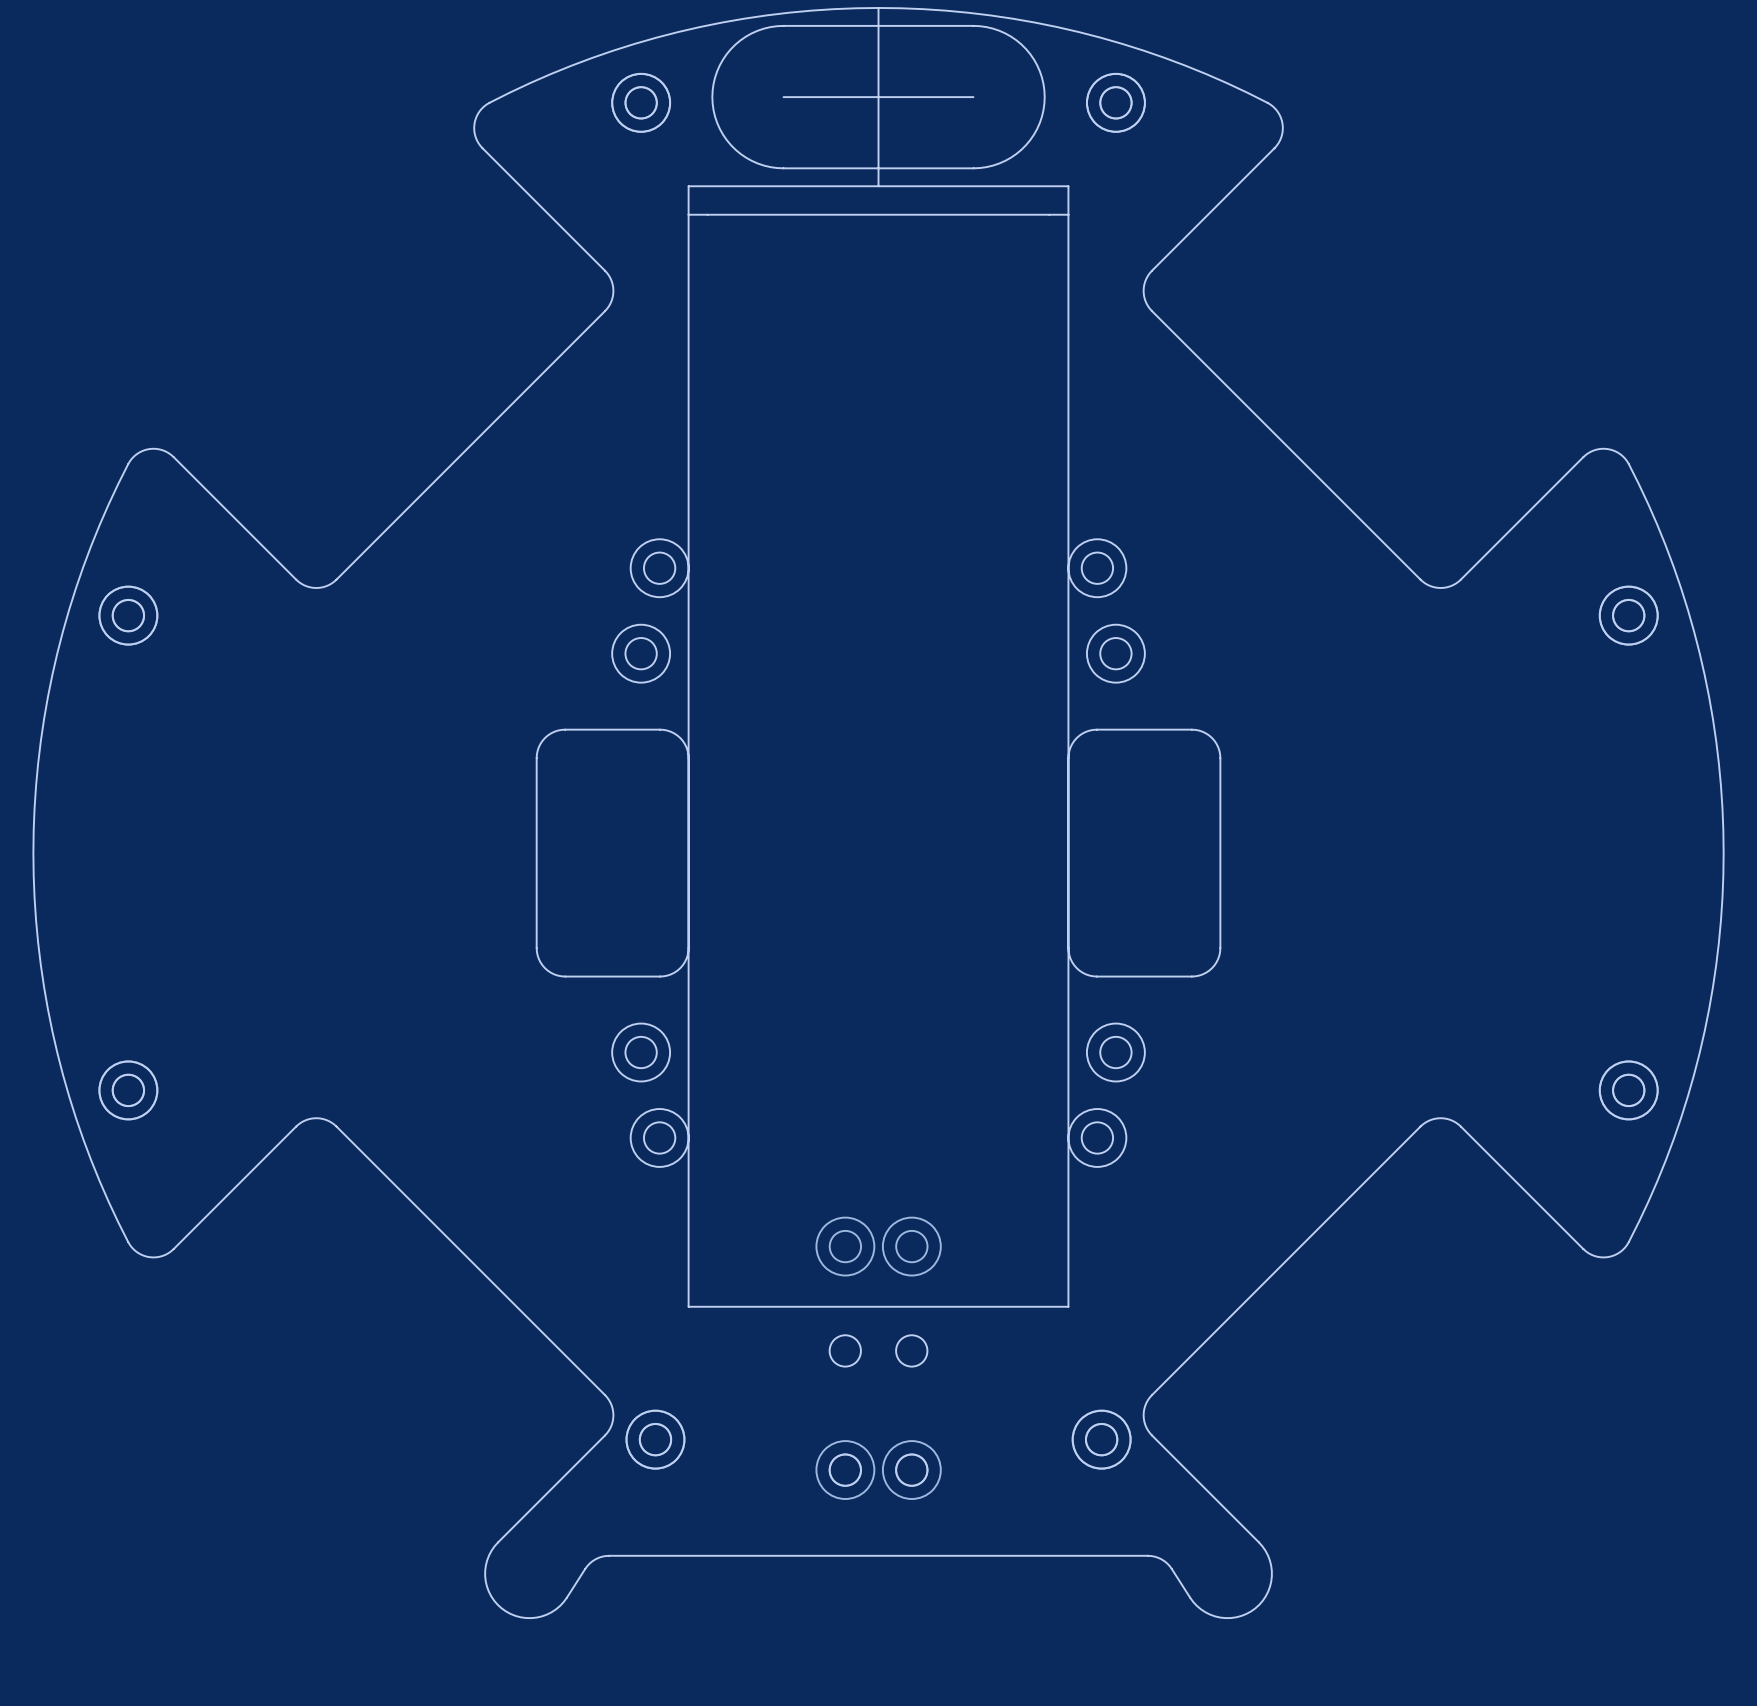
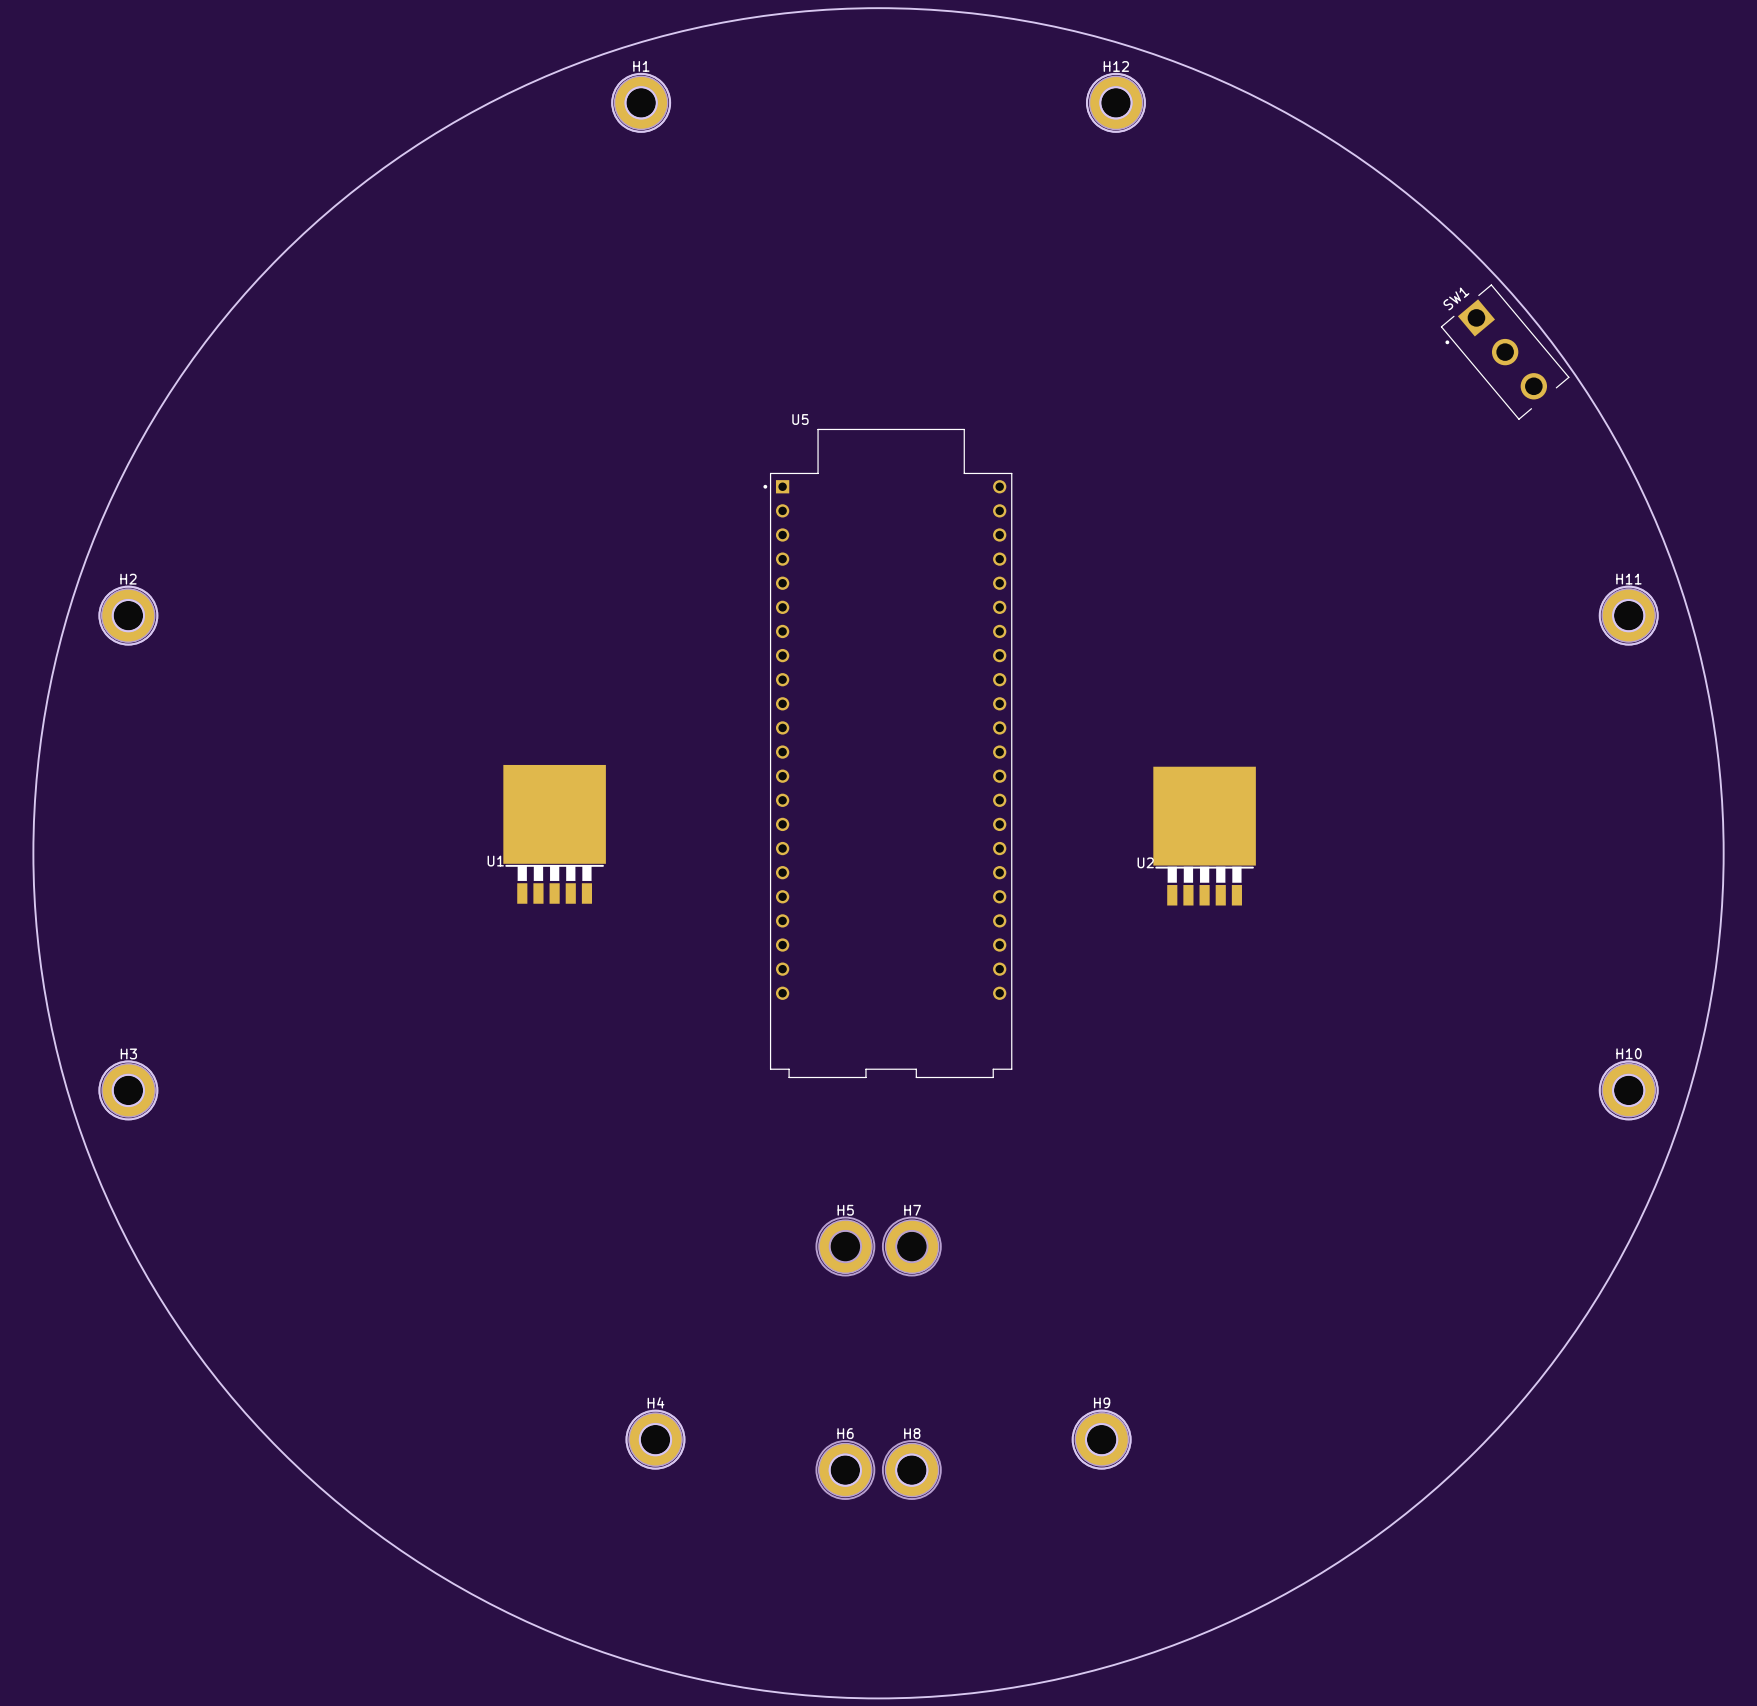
round board edge: none -> [32, 7, 1725, 1700]
board edge: (878, 7) (878, 186) -> none
board edge: (783, 25) (973, 25) (999, 30) (1021, 44) (1030, 54) (1039, 71) (1044, 97) (1039, 122) (1030, 139) (1016, 153) (999, 163) (986, 167) (783, 168) (757, 163) (735, 149) (719, 128) (713, 110) (713, 84) (723, 59) (740, 40) (764, 28) (783, 25) -> none
board edge: (783, 97) (973, 97) -> none
board edge: (489, 102) (479, 111) (475, 120) (474, 130) (478, 142) (607, 273) (611, 281) (613, 290) (611, 300) (607, 308) (336, 579) (328, 585) (313, 587) (298, 581) (173, 457) (165, 451) (152, 448) (139, 452) (128, 464) (99, 525) (75, 588) (57, 652) (40, 741) (33, 830) (34, 897) (44, 987) (63, 1075) (83, 1139) (118, 1221) (129, 1244) (136, 1252) (149, 1257) (165, 1254) (173, 1249) (298, 1124) (306, 1119) (316, 1118) (325, 1119) (336, 1126) (605, 1395) (611, 1405) (612, 1421) (607, 1433) (498, 1542) (489, 1555) (485, 1570) (488, 1591) (497, 1604) (515, 1615) (531, 1618) (551, 1612) (563, 1601) (589, 1563) (598, 1557) (609, 1555) (1151, 1556) (1167, 1563) (1193, 1602) (1205, 1612) (1225, 1618) (1246, 1613) (1259, 1604) (1268, 1591) (1271, 1576) (1267, 1555) (1258, 1542) (1149, 1433) (1145, 1424) (1143, 1415) (1145, 1405) (1151, 1395) (1420, 1126) (1428, 1120) (1443, 1118) (1458, 1124) (1583, 1249) (1591, 1254) (1601, 1257) (1614, 1255) (1627, 1244) (1648, 1201) (1673, 1139) (1694, 1075) (1712, 987) (1722, 897) (1722, 808) (1712, 718) (1694, 631) (1673, 566) (1638, 484) (1627, 461) (1620, 454) (1604, 448) (1591, 451) (1583, 457) (1458, 581) (1450, 586) (1440, 588) (1431, 586) (1422, 581) (1151, 311) (1146, 303) (1143, 287) (1149, 273) (1274, 148) (1281, 136) (1282, 127) (1277, 111) (1267, 102) (1206, 74) (1143, 50) (1078, 32) (990, 15) (900, 8) (811, 10) (722, 22) (635, 43) (550, 74) (489, 102) -> none
H1: none -> (641, 102)
H12: none -> (1116, 102)
board edge: (688, 186) (688, 1306) (1068, 1306) (1068, 186) (688, 186) -> none
board edge: (688, 214) (1068, 214) -> none
SW1: none -> (1505, 352)
round board edge: [629, 538, 690, 599] -> none
round board edge: [1067, 538, 1128, 599] -> none
round board edge: [643, 551, 677, 585] -> none
round board edge: [1080, 551, 1115, 585] -> none
H2: none -> (128, 615)
H11: none -> (1628, 615)
round board edge: [611, 623, 672, 684] -> none
round board edge: [1086, 623, 1146, 684] -> none
round board edge: [624, 637, 658, 671] -> none
round board edge: [1099, 637, 1133, 671] -> none
U5: none -> (887, 753)
board edge: (688, 758) (686, 747) (680, 738) (671, 731) (660, 729) (557, 730) (542, 740) (536, 758) (536, 948) (542, 965) (550, 972) (561, 976) (663, 976) (680, 968) (686, 958) (688, 948) -> none
board edge: (1068, 758) (1070, 747) (1076, 738) (1086, 731) (1096, 729) (1199, 730) (1214, 740) (1220, 758) (1220, 948) (1214, 965) (1206, 972) (1195, 976) (1093, 976) (1082, 972) (1074, 965) (1068, 948) -> none
U1: none -> (554, 834)
U2: none -> (1204, 836)
round board edge: [611, 1022, 672, 1083] -> none
round board edge: [1086, 1022, 1146, 1083] -> none
round board edge: [624, 1035, 658, 1070] -> none
round board edge: [1099, 1035, 1133, 1070] -> none
H3: none -> (128, 1090)
H10: none -> (1628, 1090)
round board edge: [629, 1108, 690, 1168] -> none
round board edge: [1067, 1108, 1128, 1168] -> none
round board edge: [643, 1121, 677, 1155] -> none
round board edge: [1080, 1121, 1115, 1155] -> none
H5: none -> (845, 1246)
H7: none -> (912, 1246)
round board edge: [828, 1334, 862, 1368] -> none
round board edge: [895, 1334, 929, 1368] -> none
H4: none -> (655, 1439)
H9: none -> (1101, 1439)
H6: none -> (845, 1470)
H8: none -> (912, 1470)

